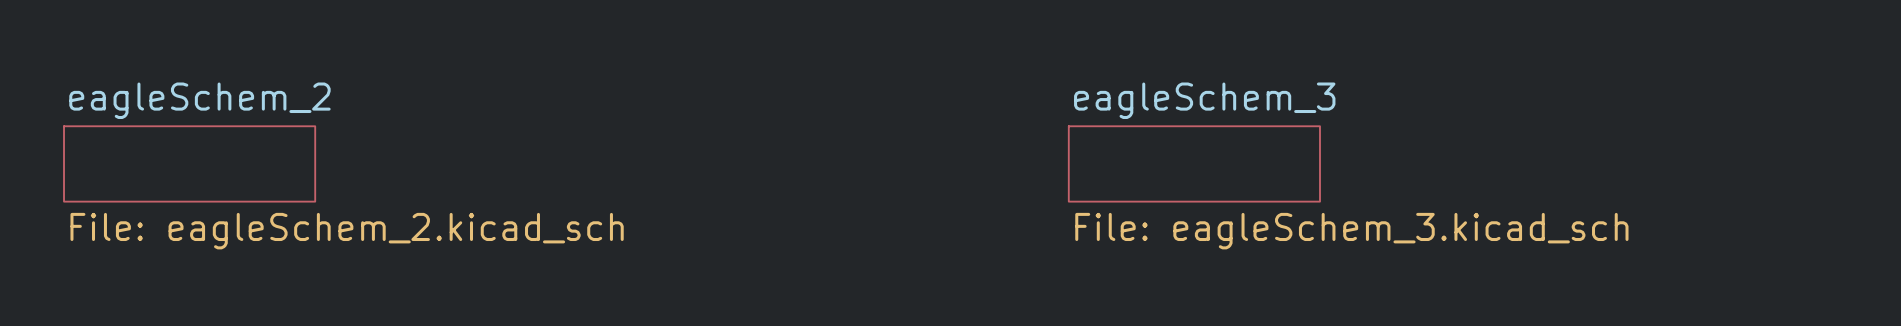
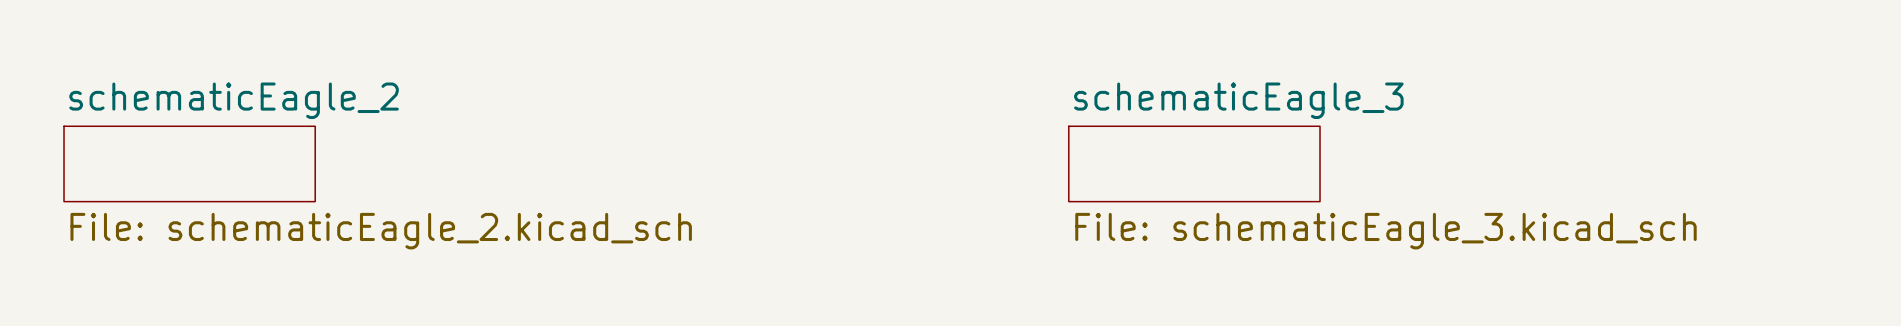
sheet eagleSchem_2 name: eagleSchem_2 (199, 100) -> schematicEagle_2 (234, 100)
sheet eagleSchem_3 name: eagleSchem_3 (1204, 100) -> schematicEagle_3 (1238, 100)
sheet eagleSchem_2 value: File: eagleSchem_2.kicad_sch (347, 231) -> File: schematicEagle_2.kicad_sch (381, 231)
sheet eagleSchem_3 value: File: eagleSchem_3.kicad_sch (1351, 231) -> File: schematicEagle_3.kicad_sch (1385, 231)

